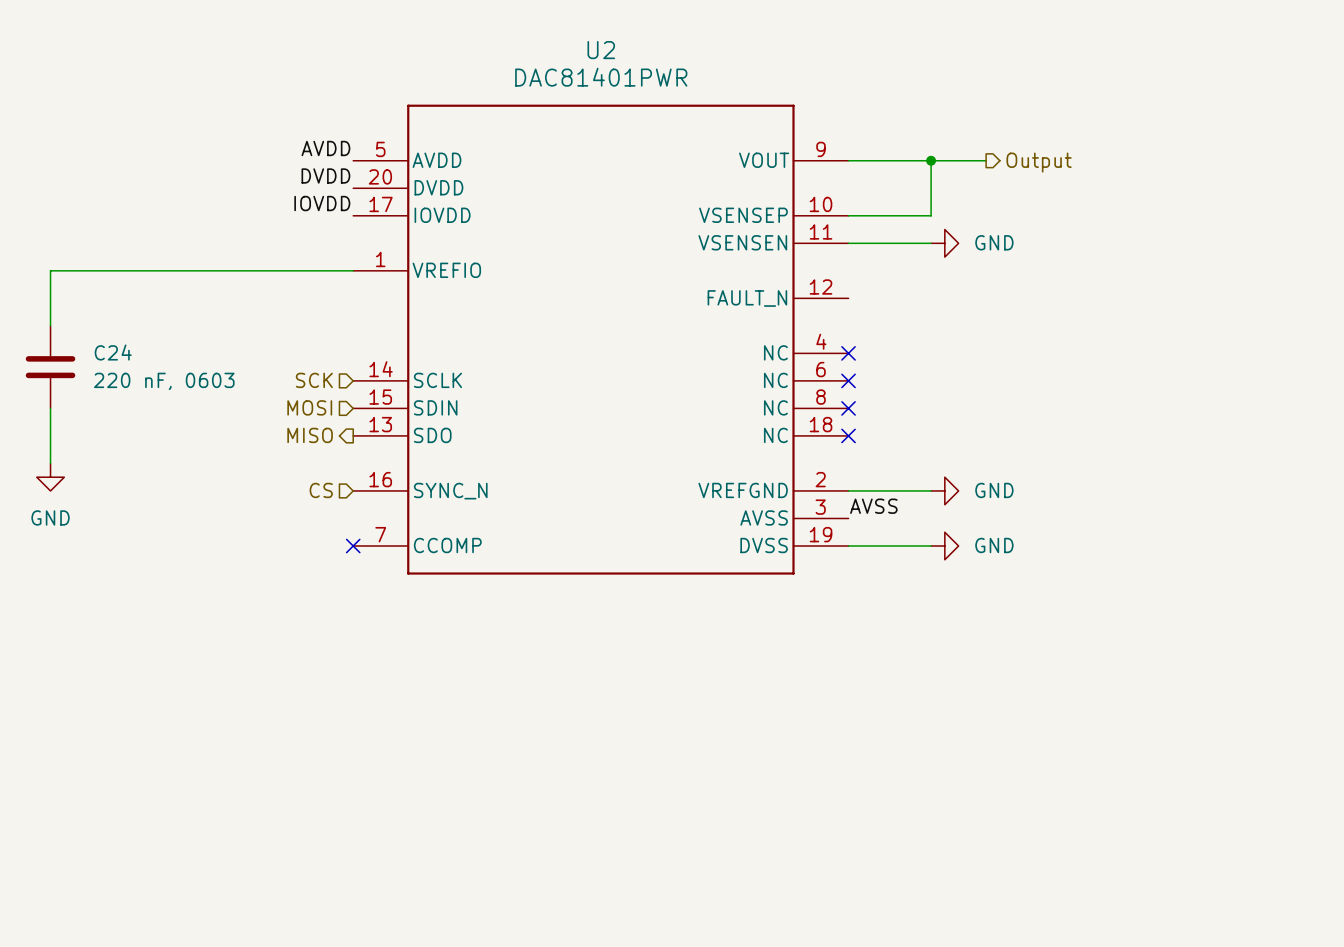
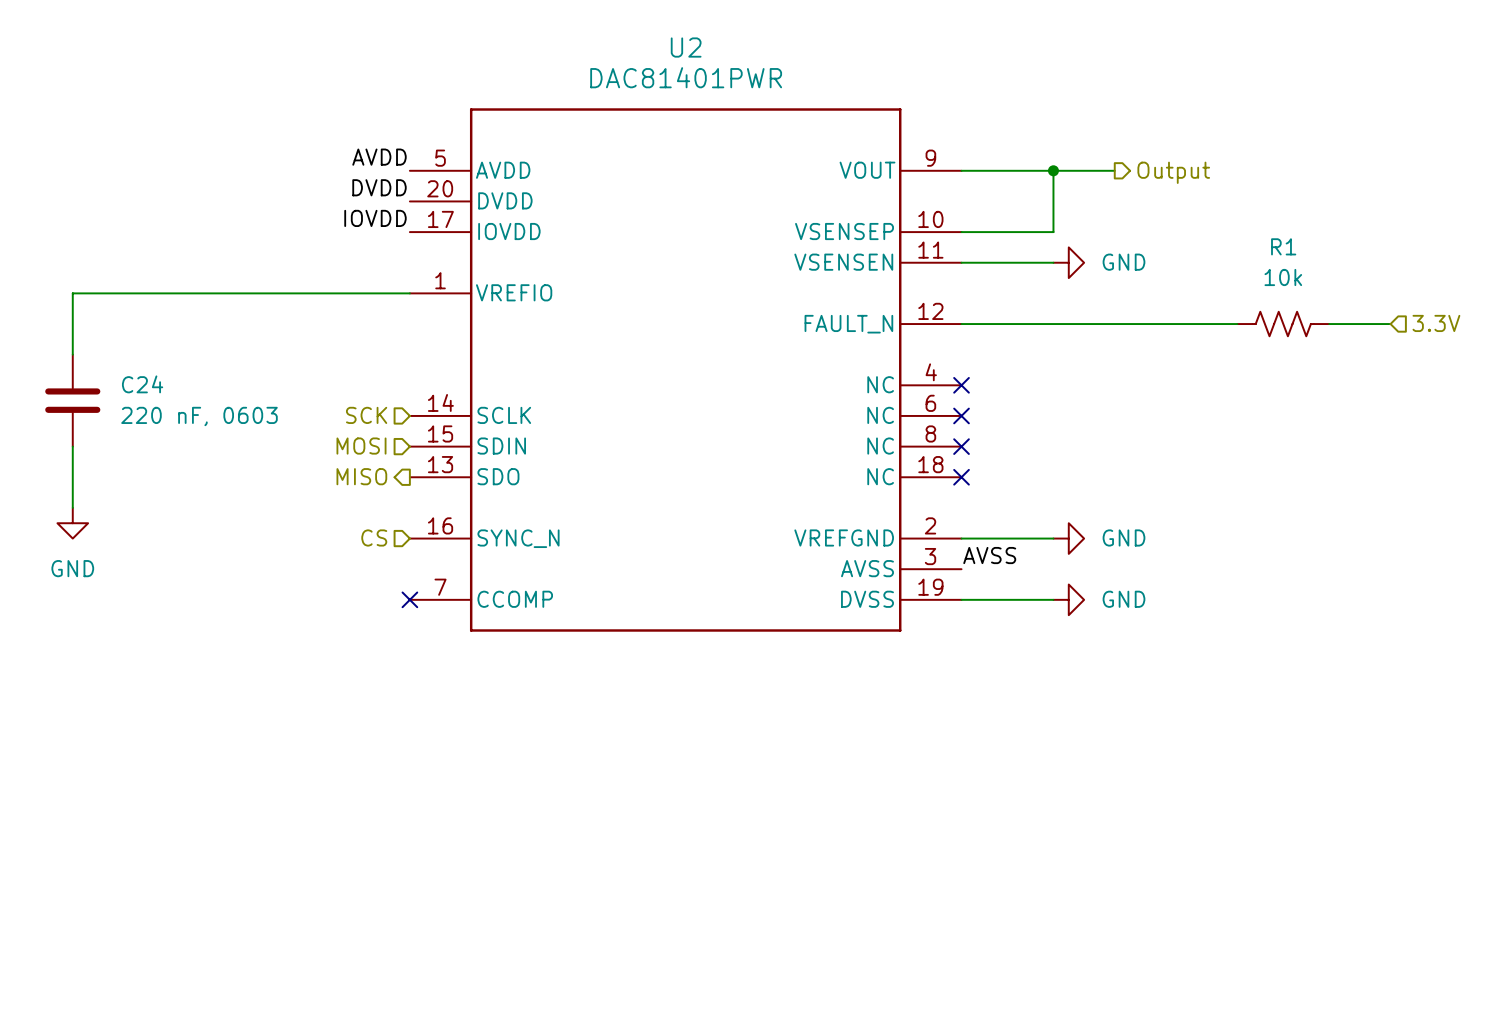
hierarchical label: none -> 3.3V (1436, 323)
wire: none -> (961, 324) (1237, 324)
R1: none -> 10k (1283, 324)
wire: none -> (1329, 324) (1390, 324)

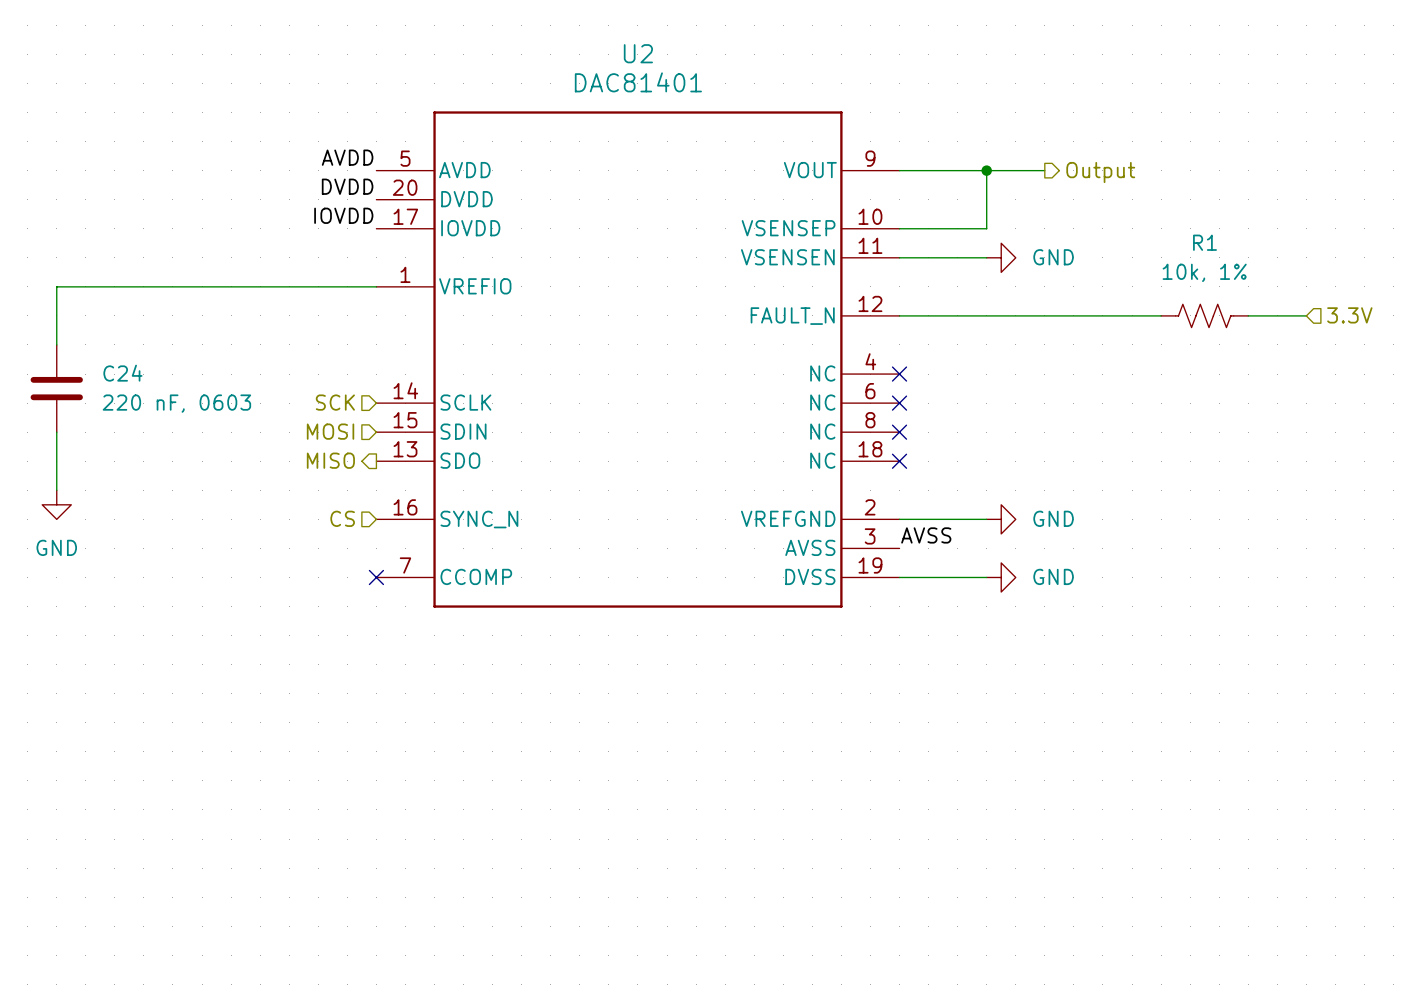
U2 value: DAC81401PWR (686, 77) -> DAC81401 (638, 82)
R1 value: 10k (1283, 277) -> 10k, 1% (1204, 272)

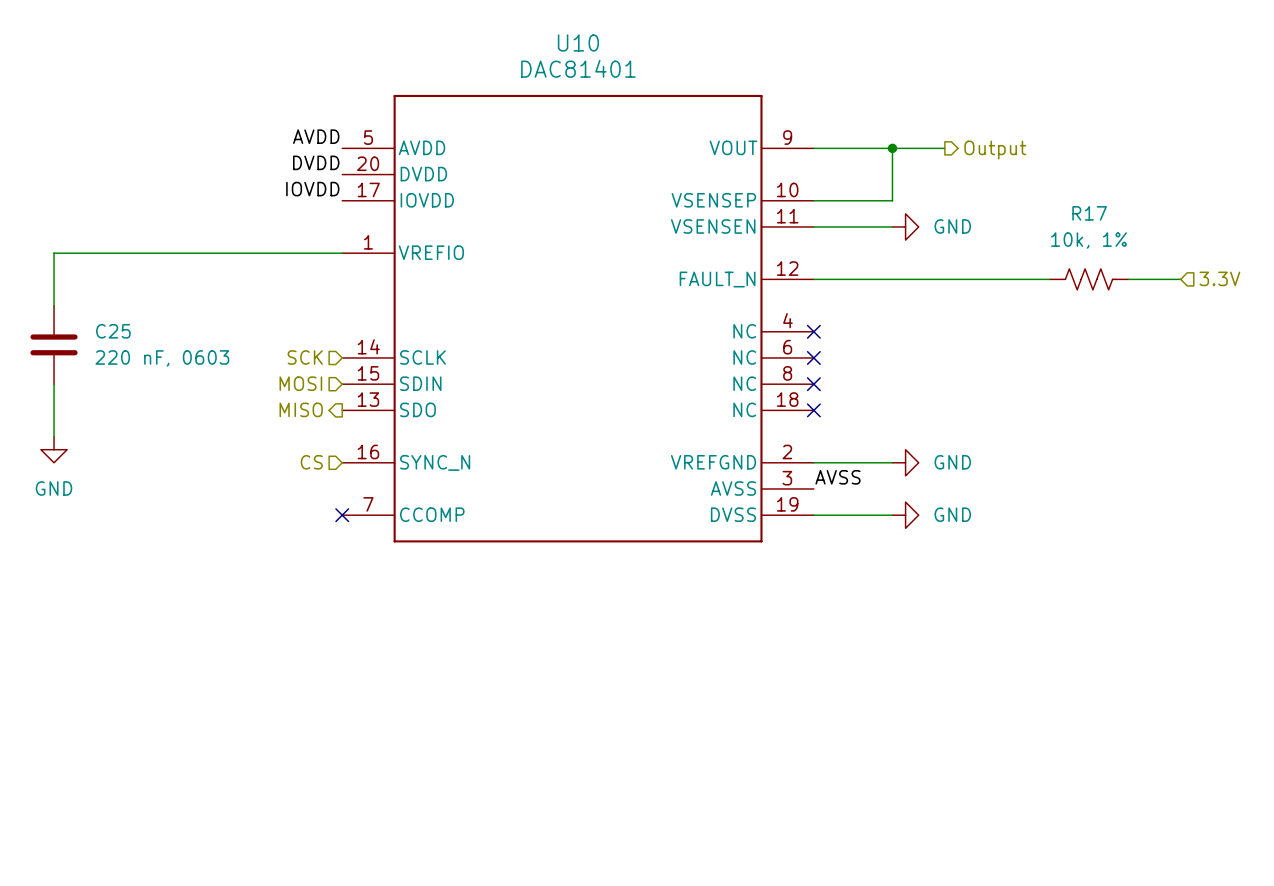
U2 name: U2 (638, 53) -> U10 (578, 42)
R1 name: R1 (1204, 242) -> R17 (1089, 213)
C24 name: C24 (122, 373) -> C25 (113, 331)

